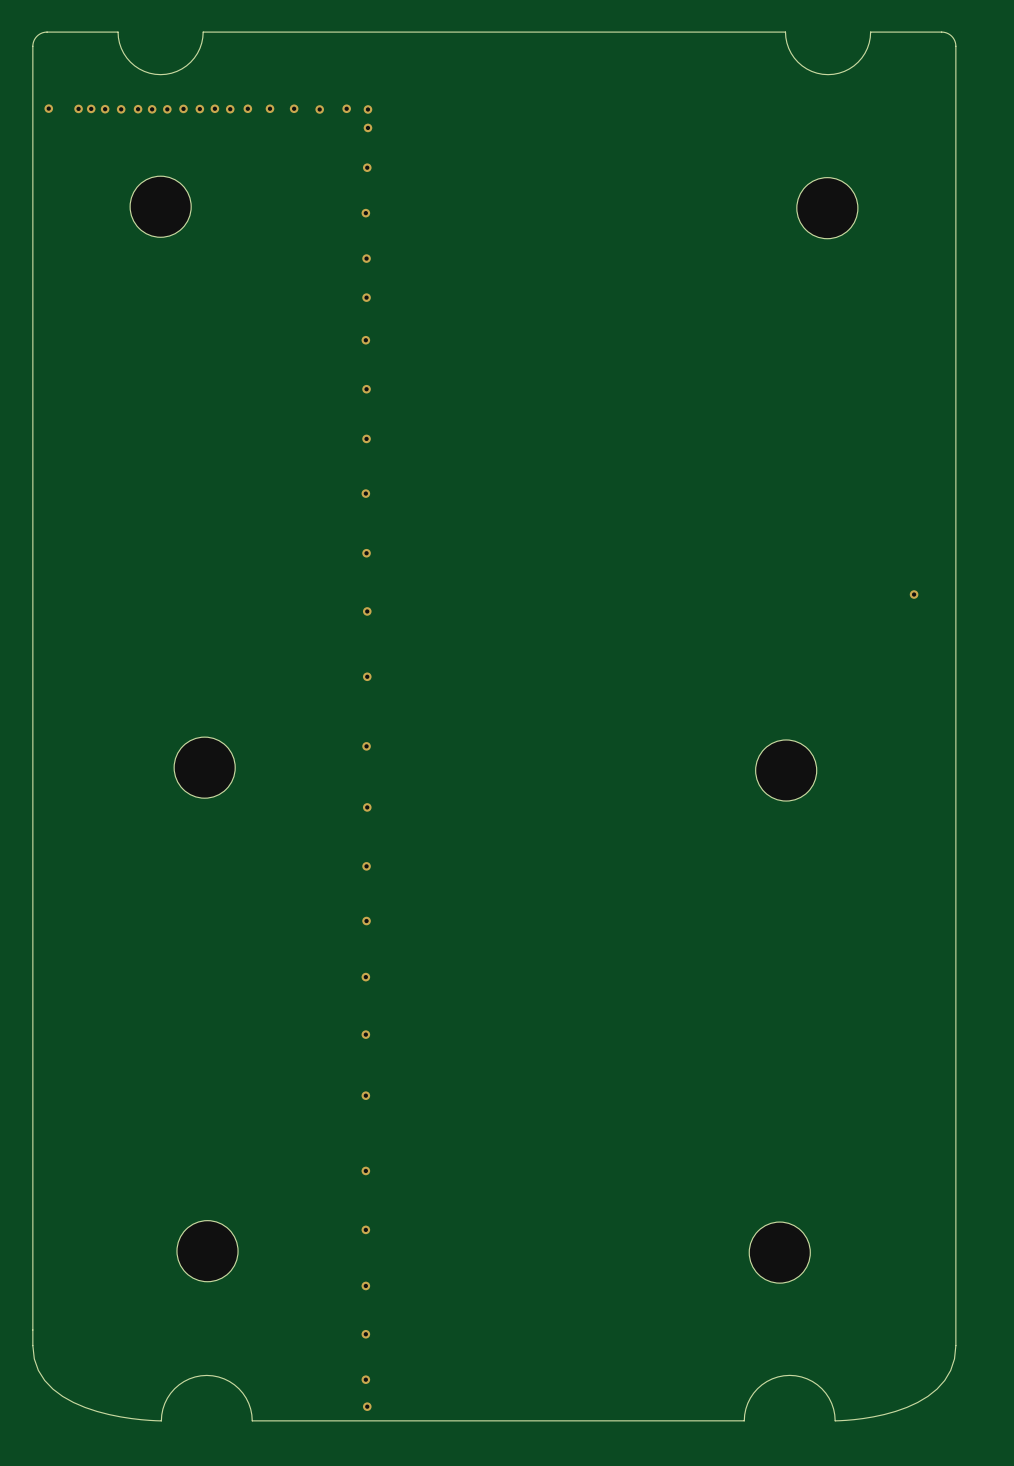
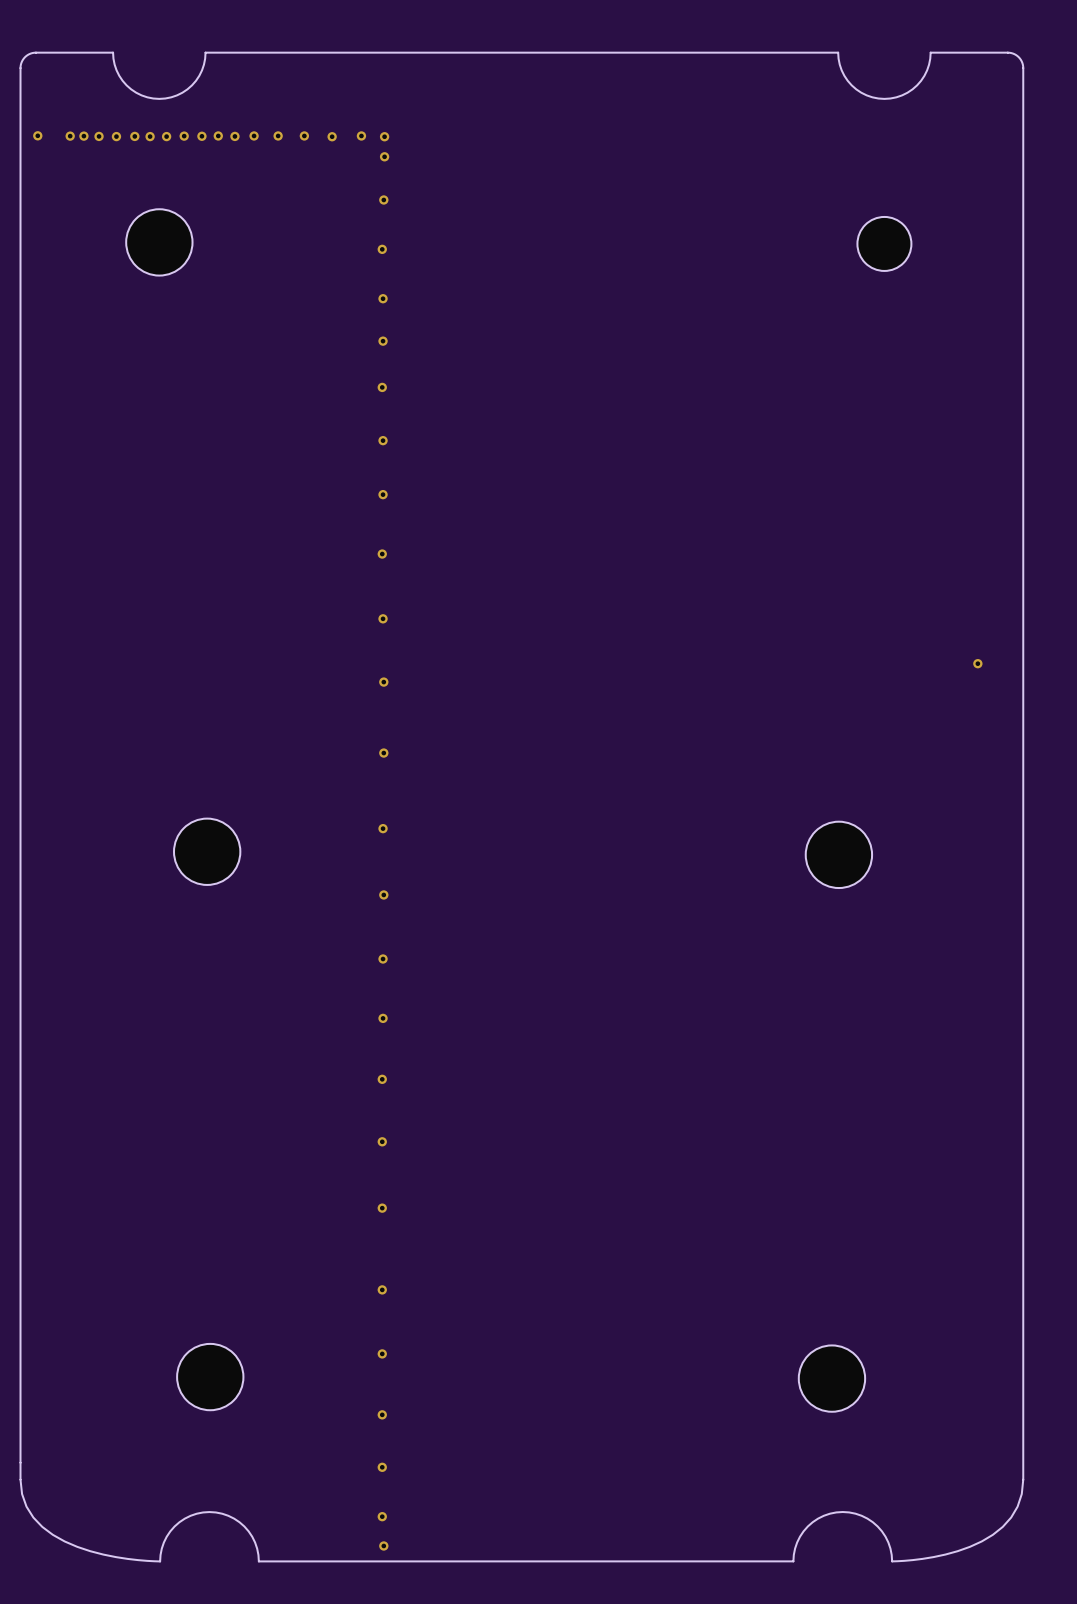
part footprint: [796, 177, 858, 239] -> [857, 216, 912, 271]

